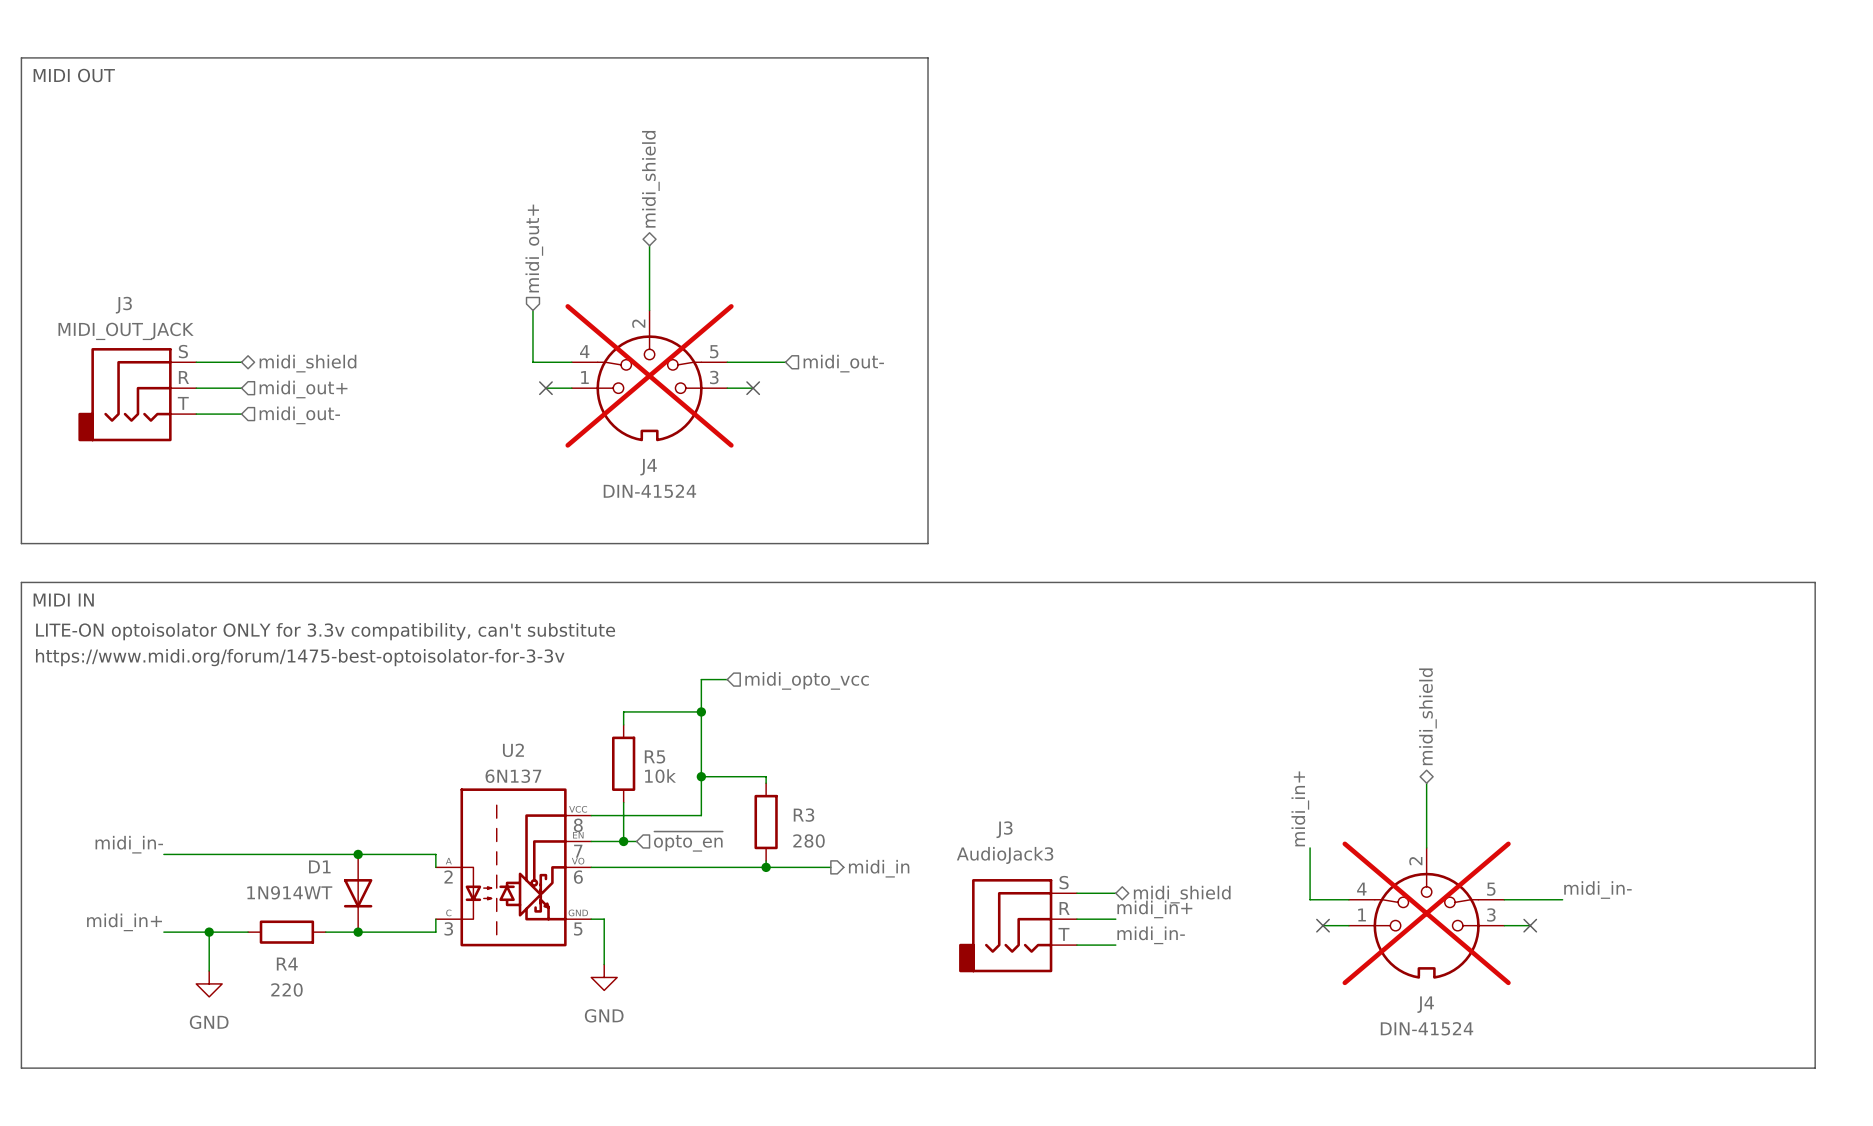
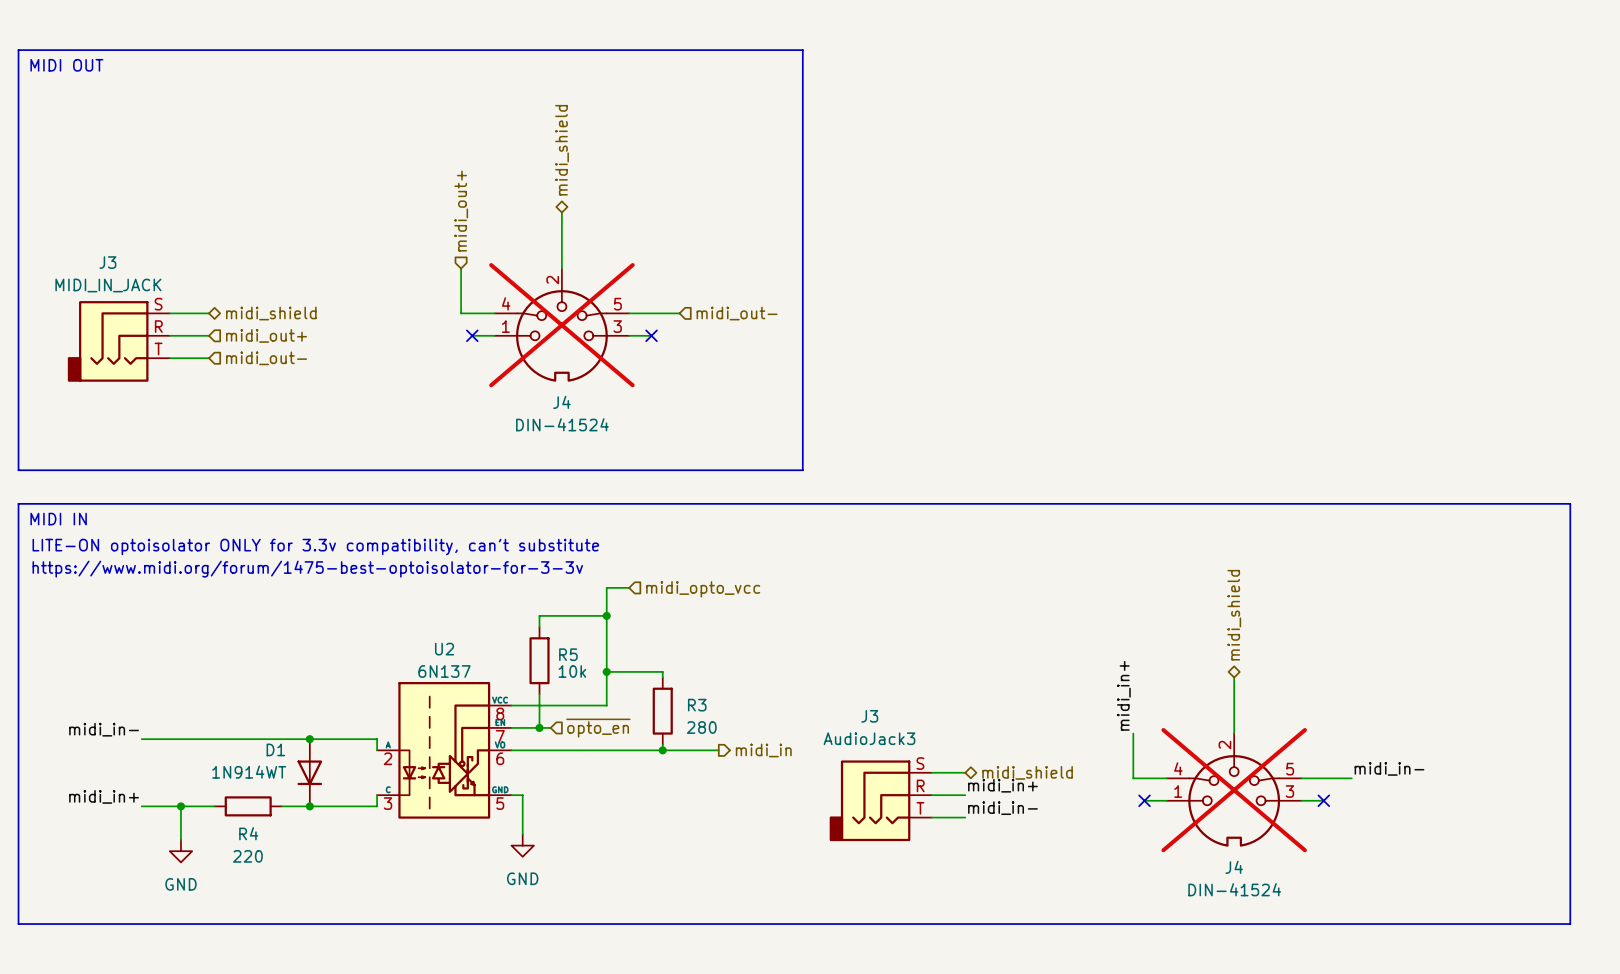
J3 value: MIDI_OUT_JACK (126, 331) -> MIDI_IN_JACK (108, 285)

